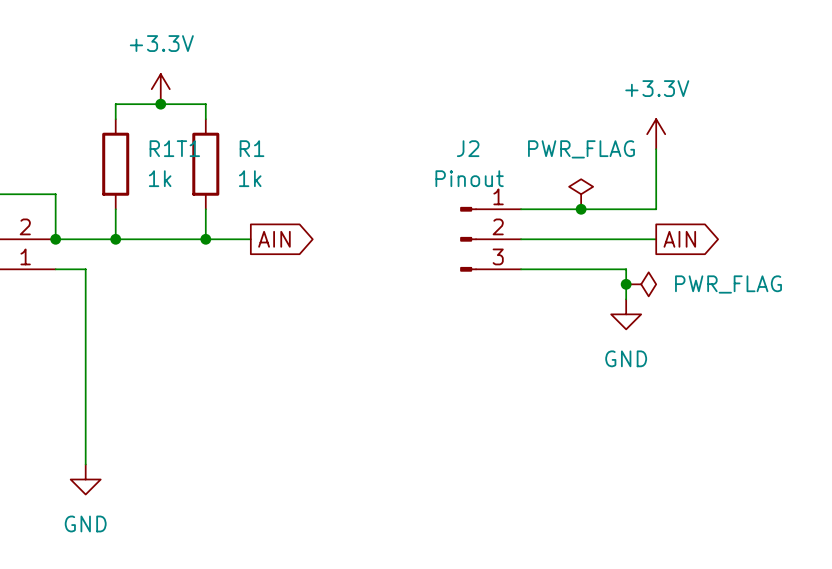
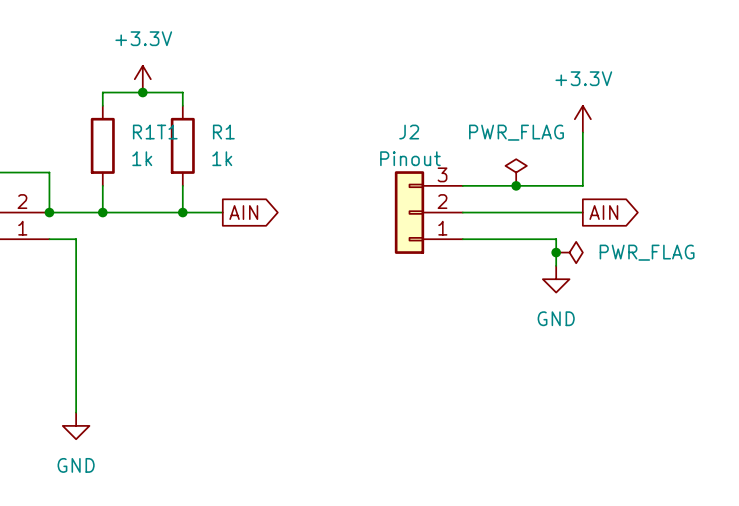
J2 symbol: [460, 206, 522, 272] -> [394, 171, 463, 254]

